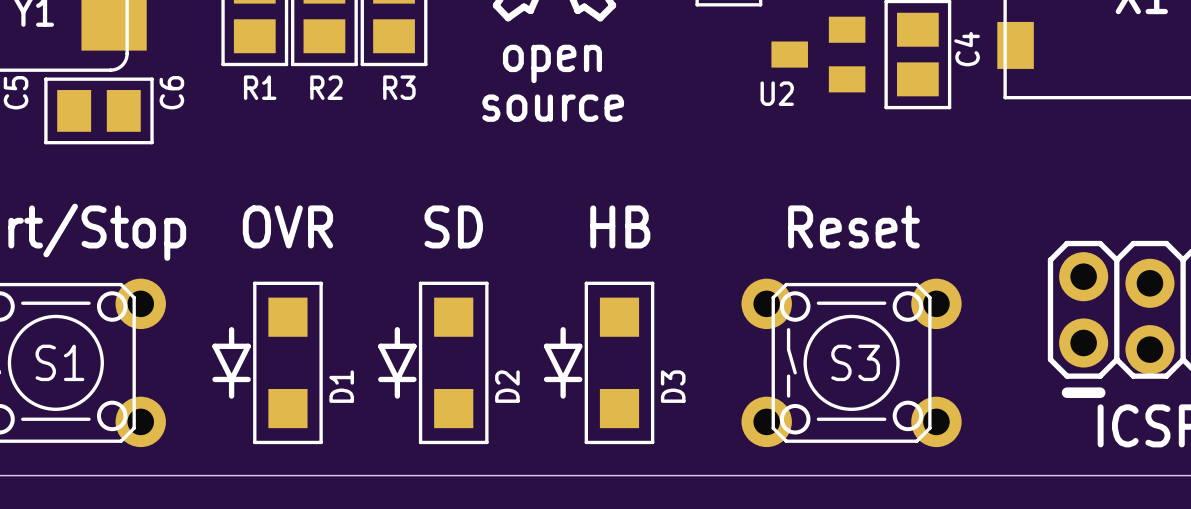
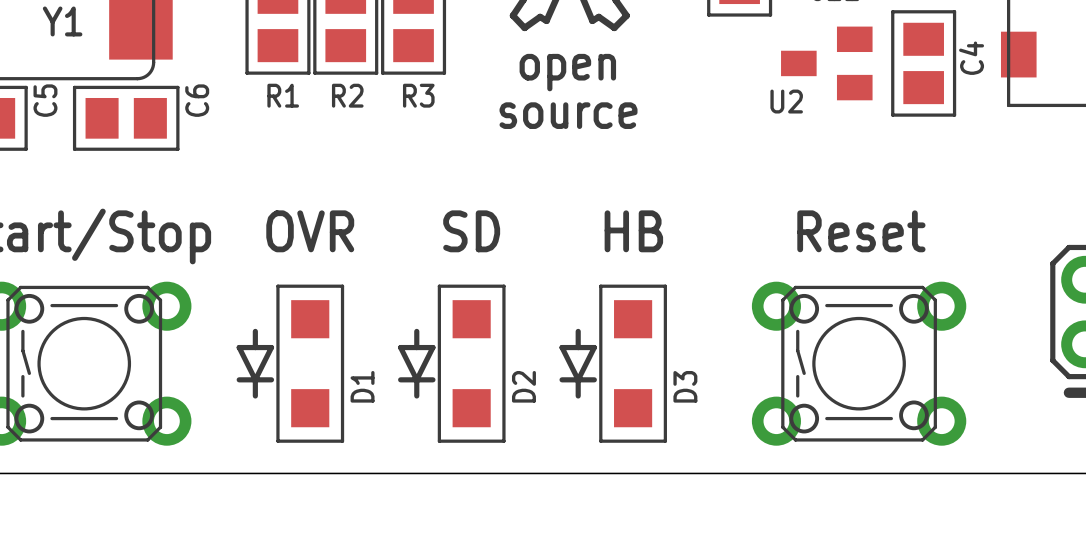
S1 name: S1 (59, 362) -> none
S3 name: S3 (855, 362) -> none

